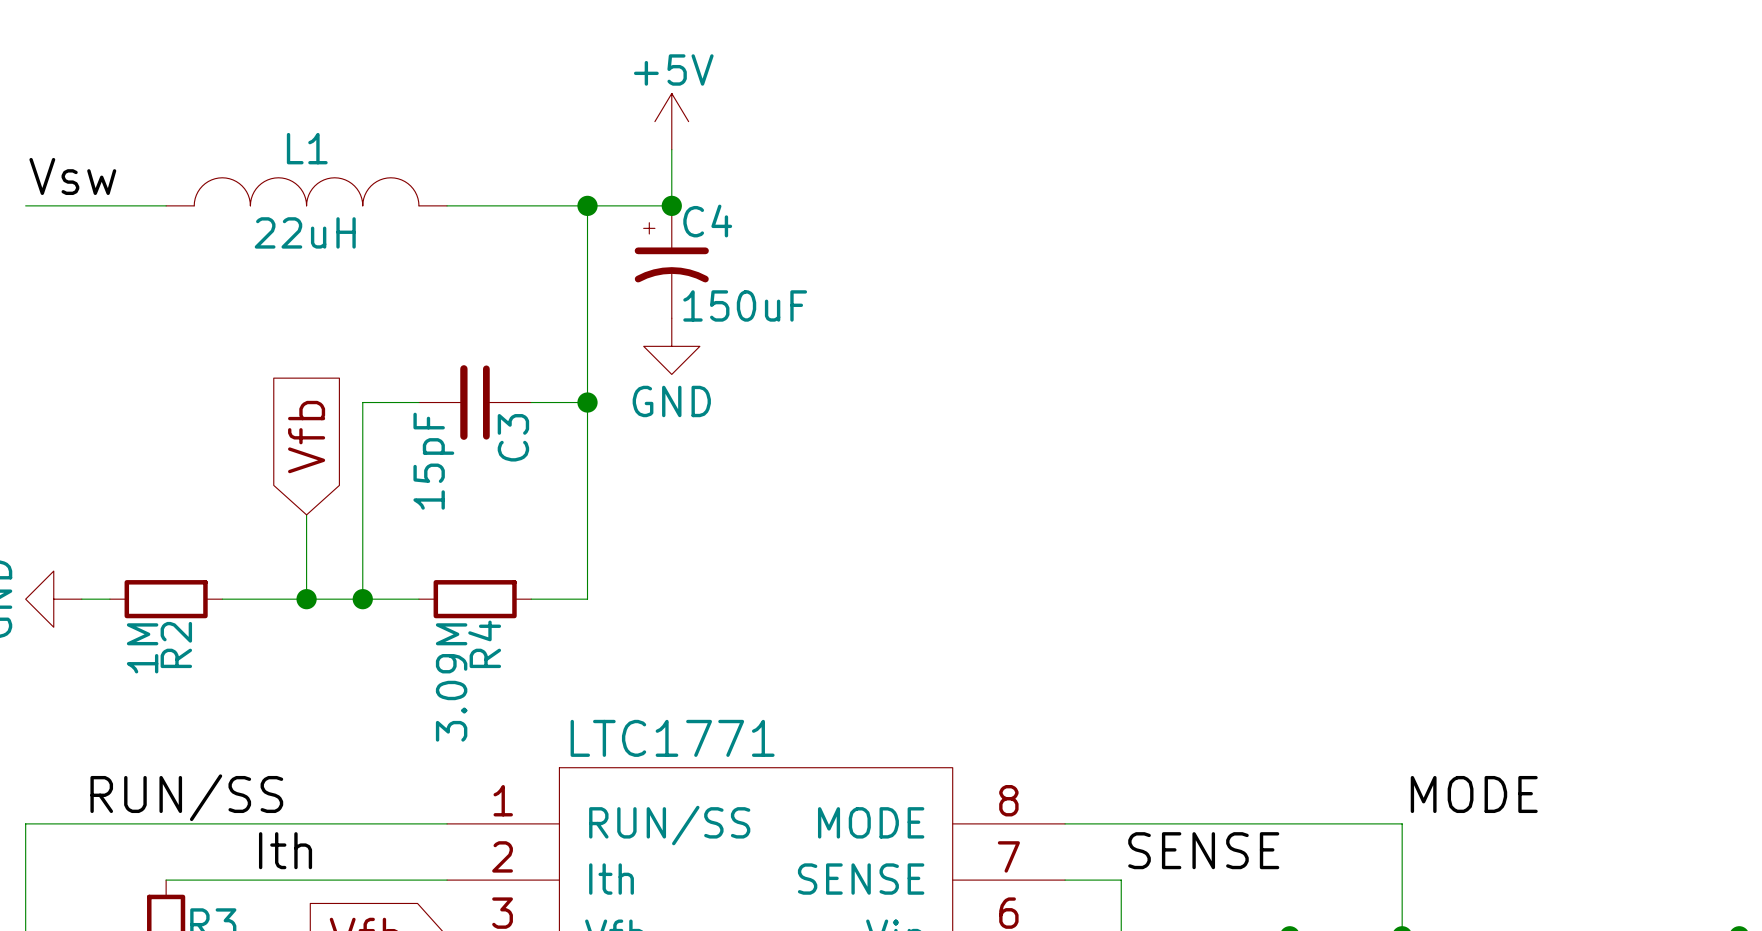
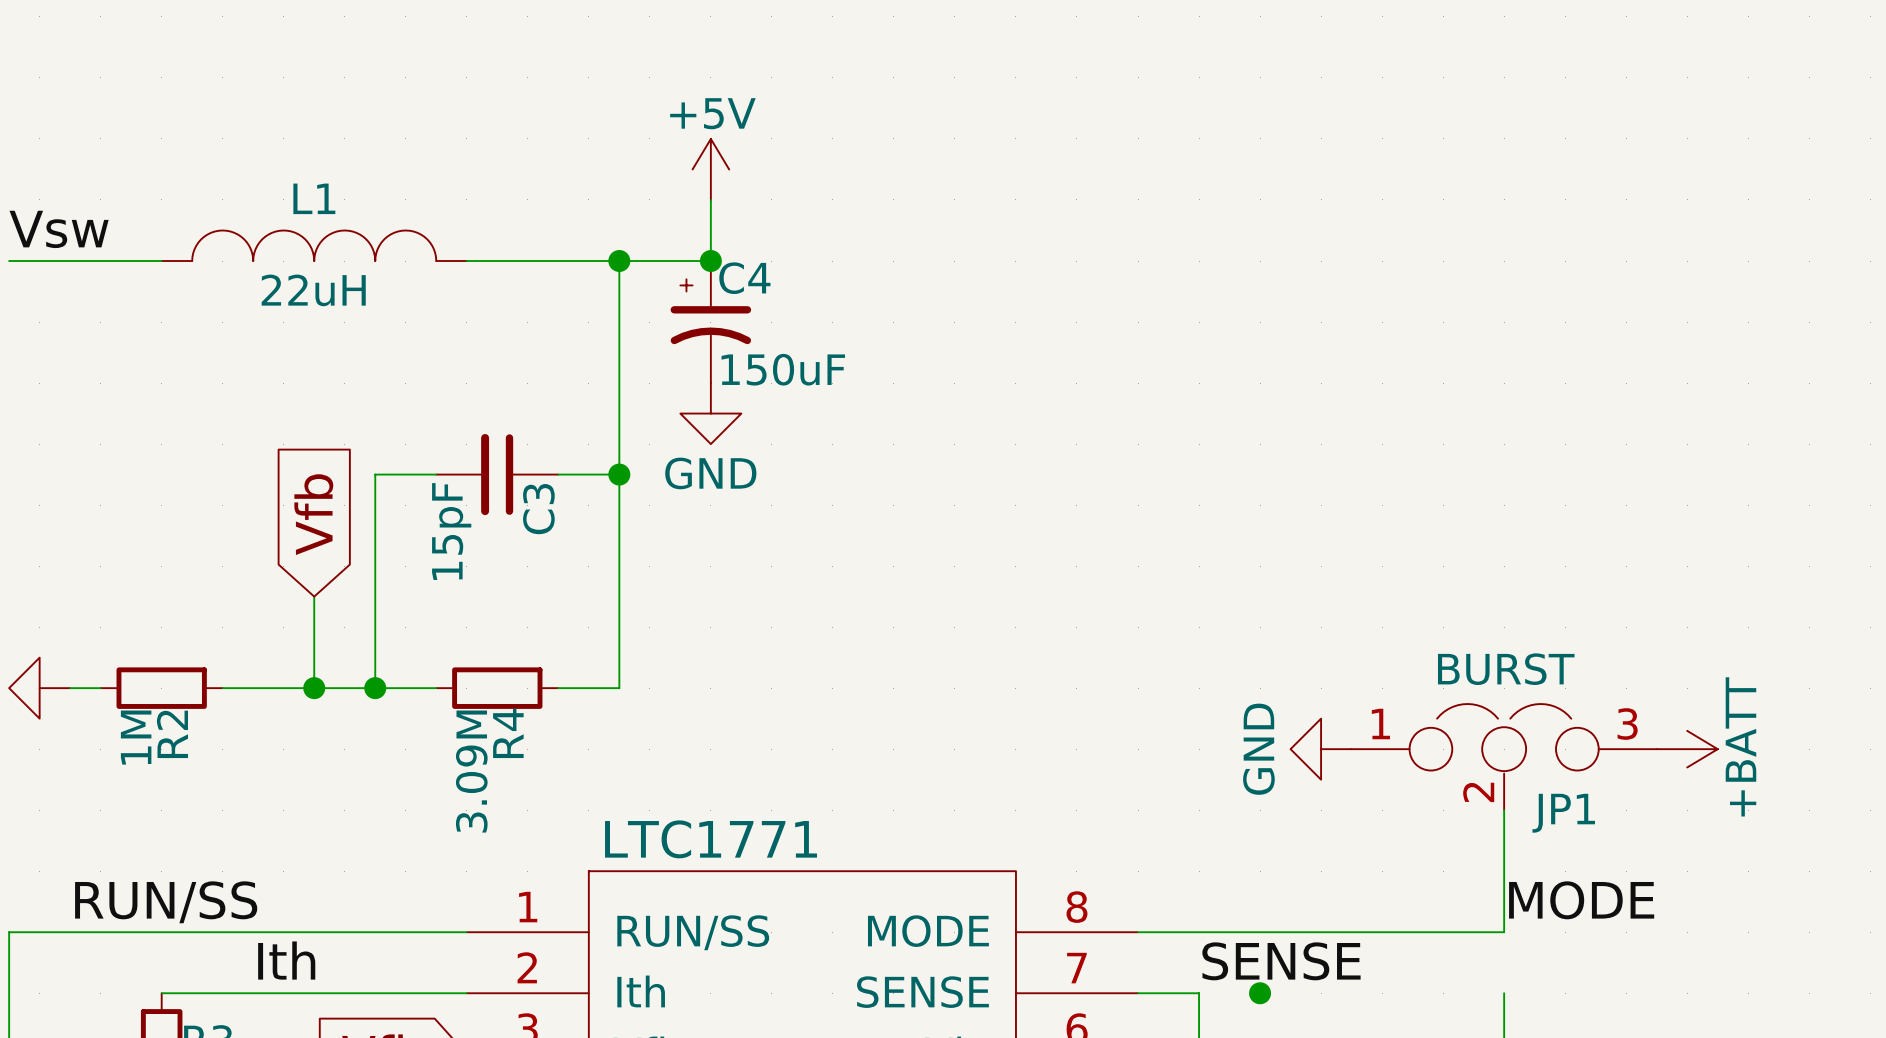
power symbol: none -> GND (1321, 749)
power symbol: none -> +BATT (1687, 749)
JP1: none -> BURST (1504, 757)
wire: (1402, 823) (1402, 880) -> (1504, 932) (1504, 810)
junction: none -> (1260, 993)

